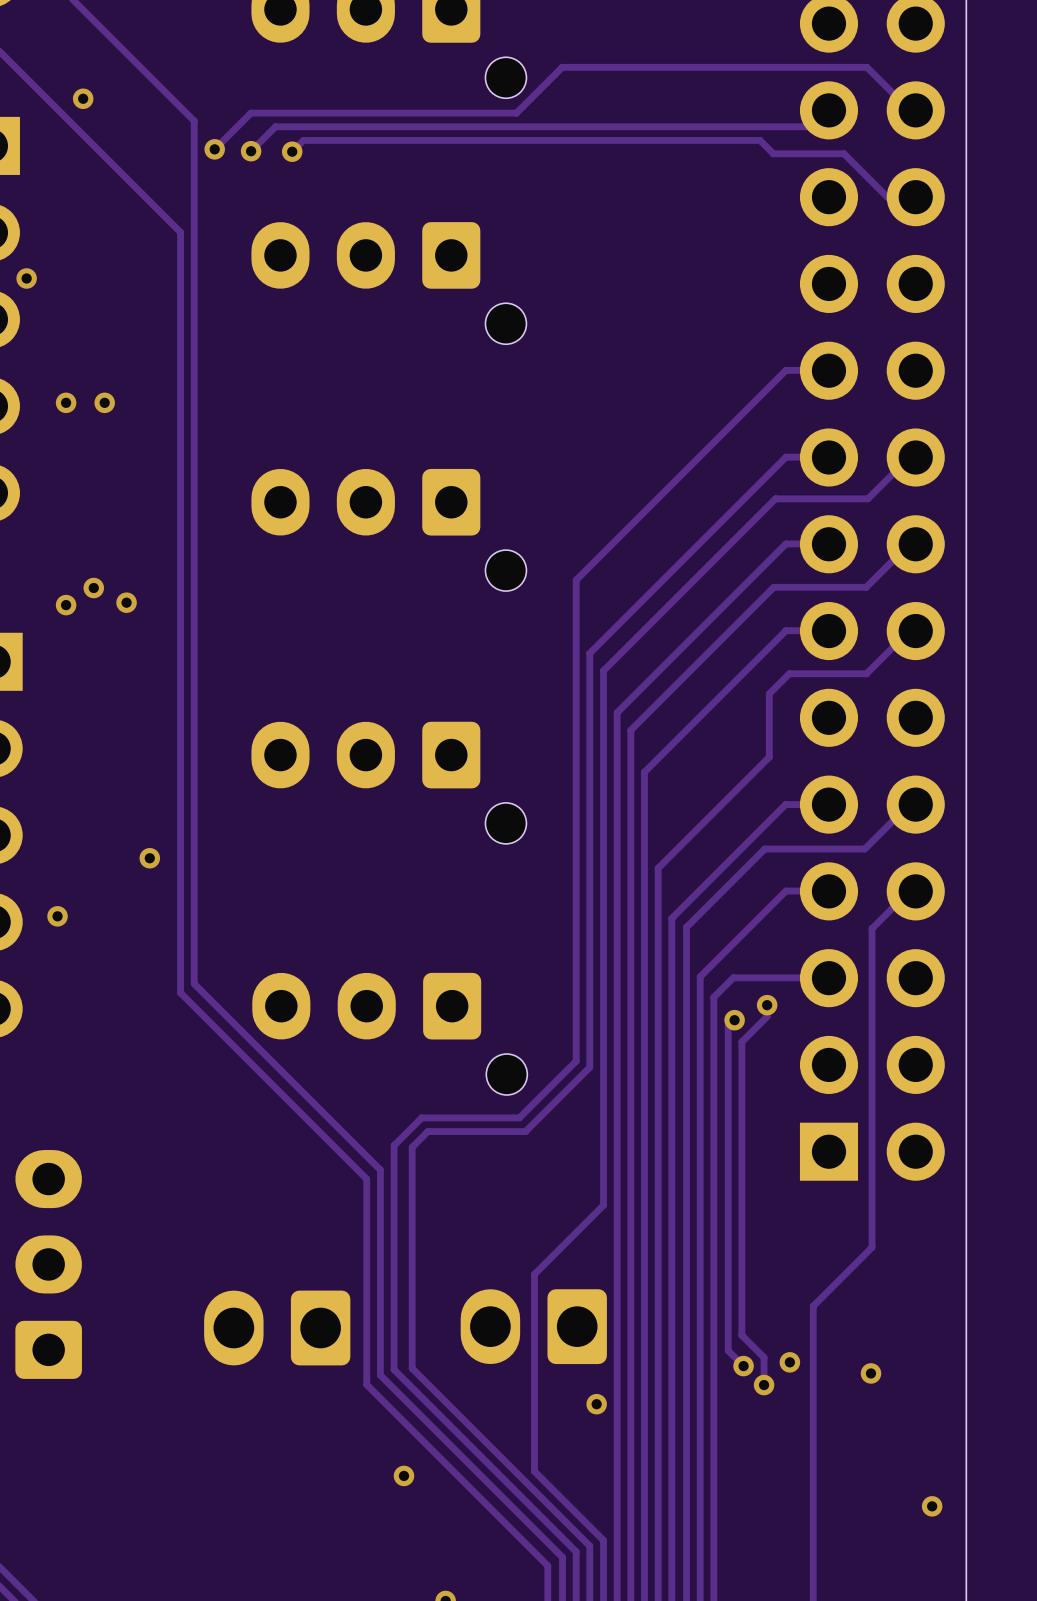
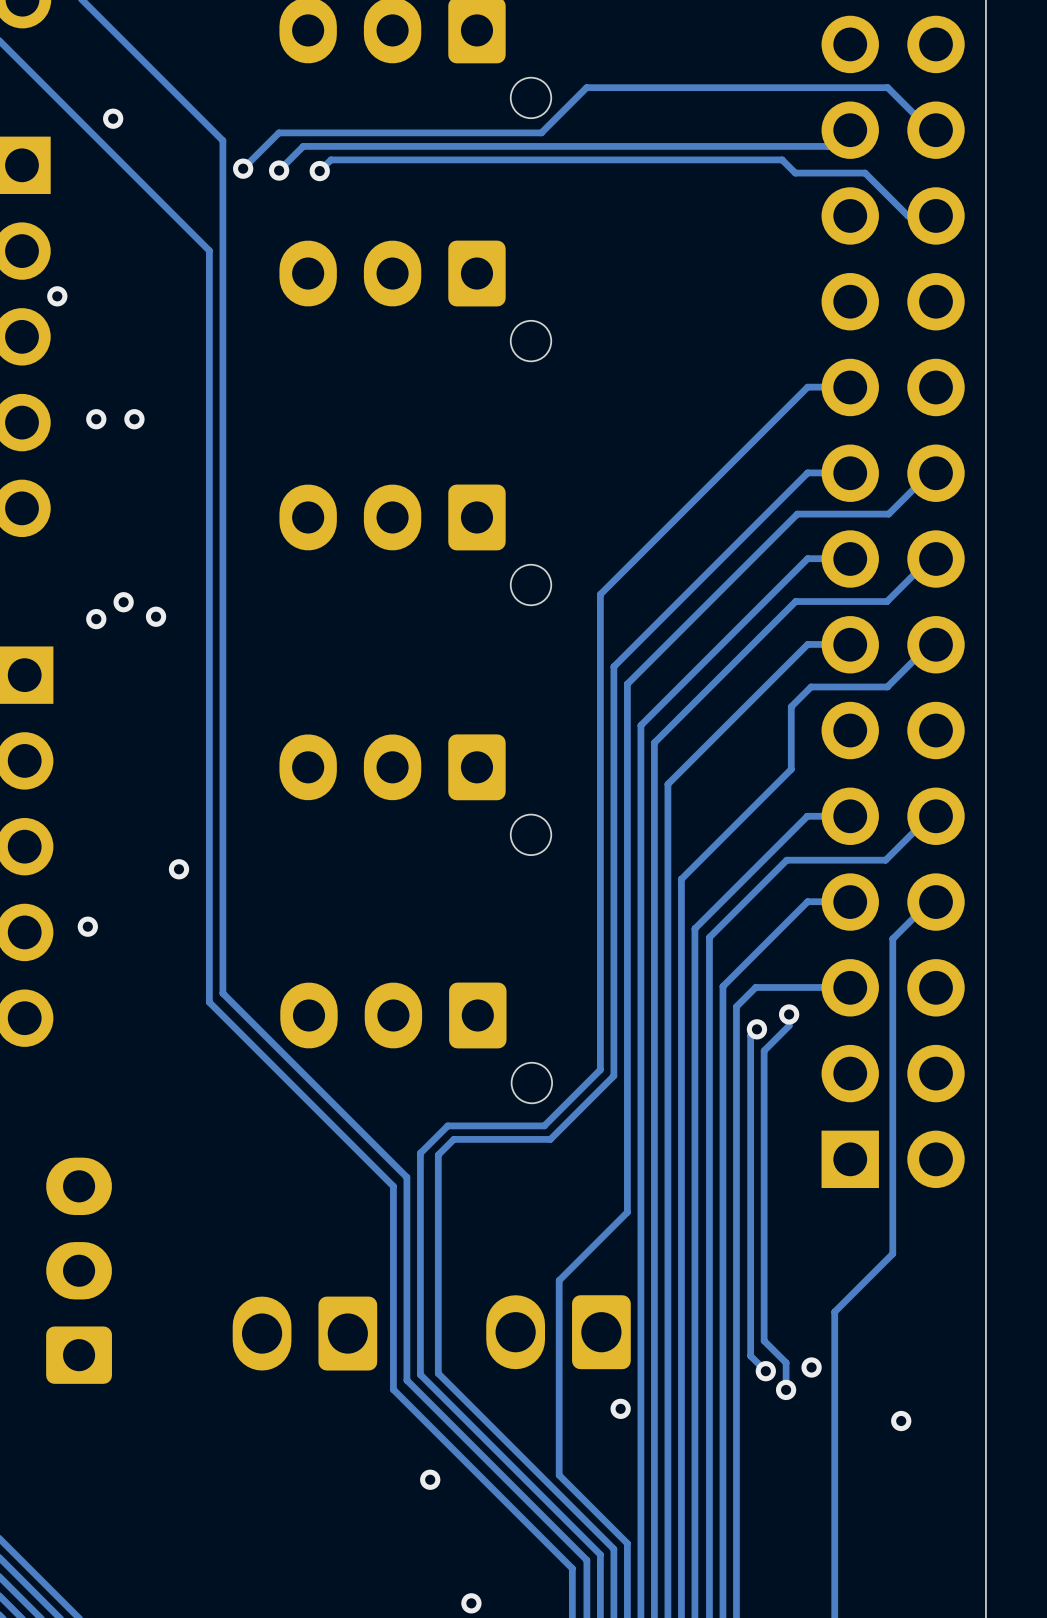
via position: (871, 1373) -> (901, 1421)
via: (932, 1506) -> none

